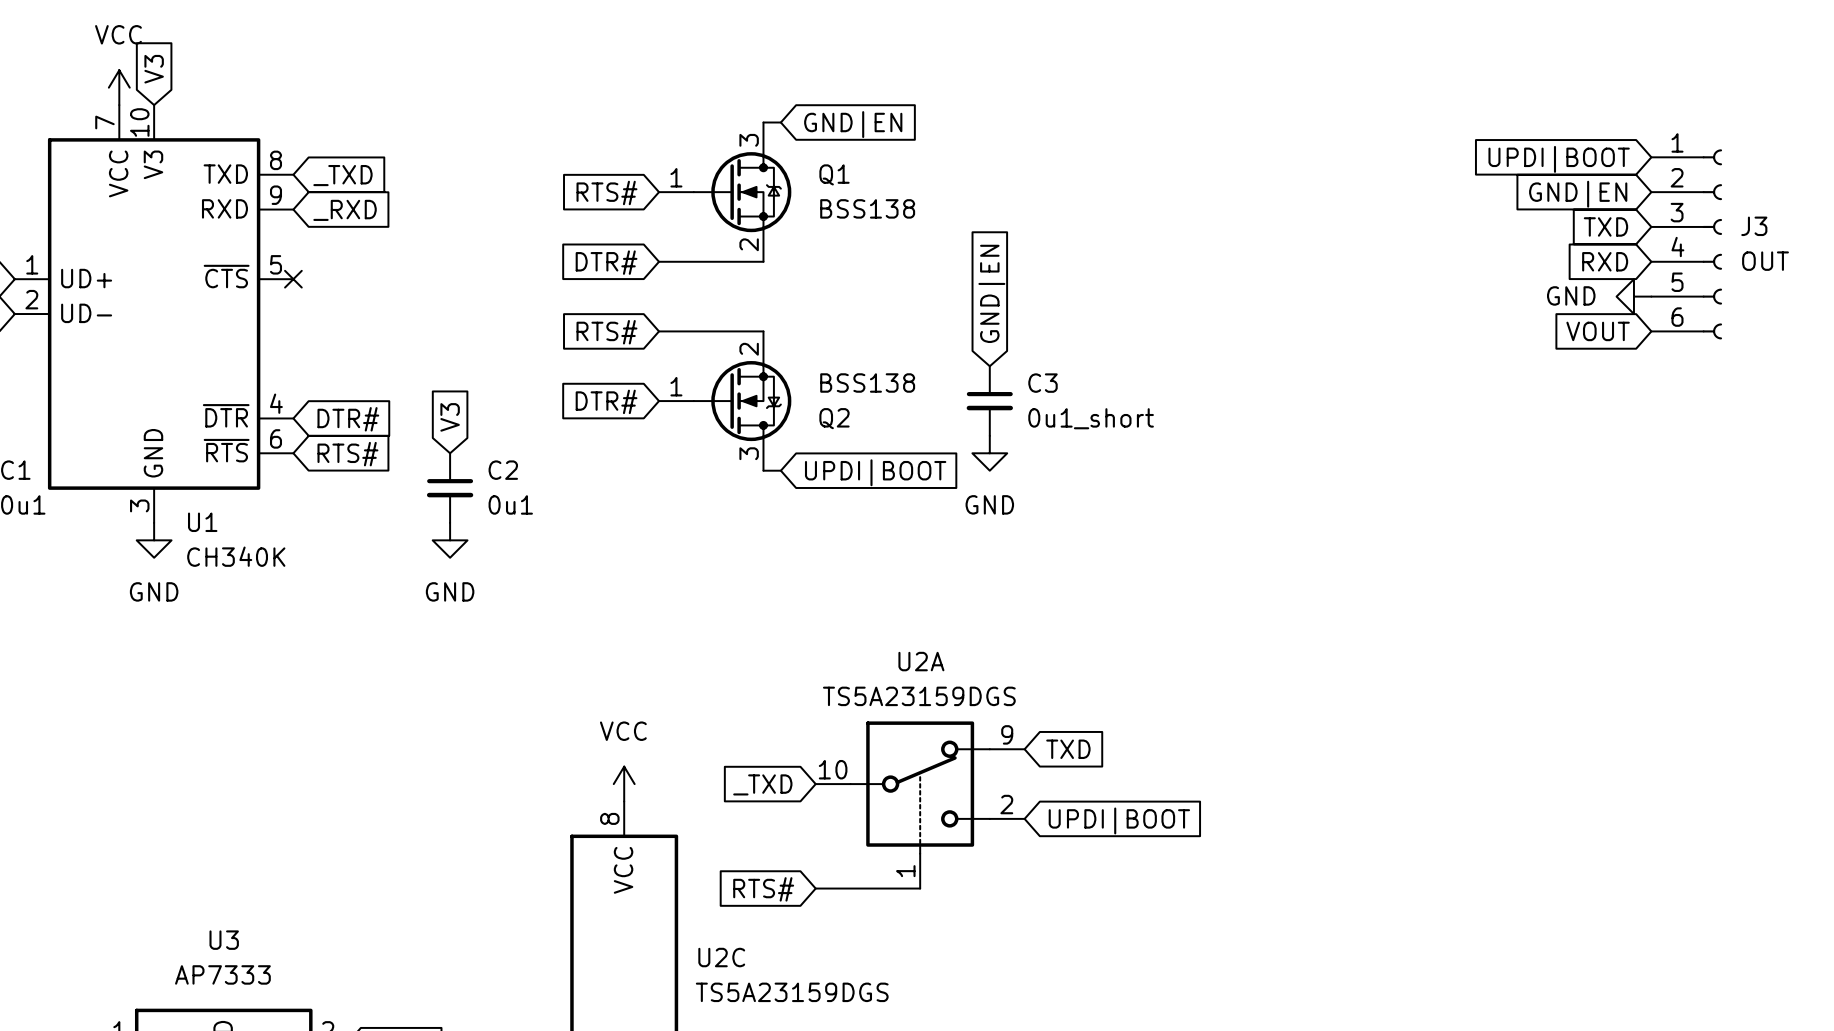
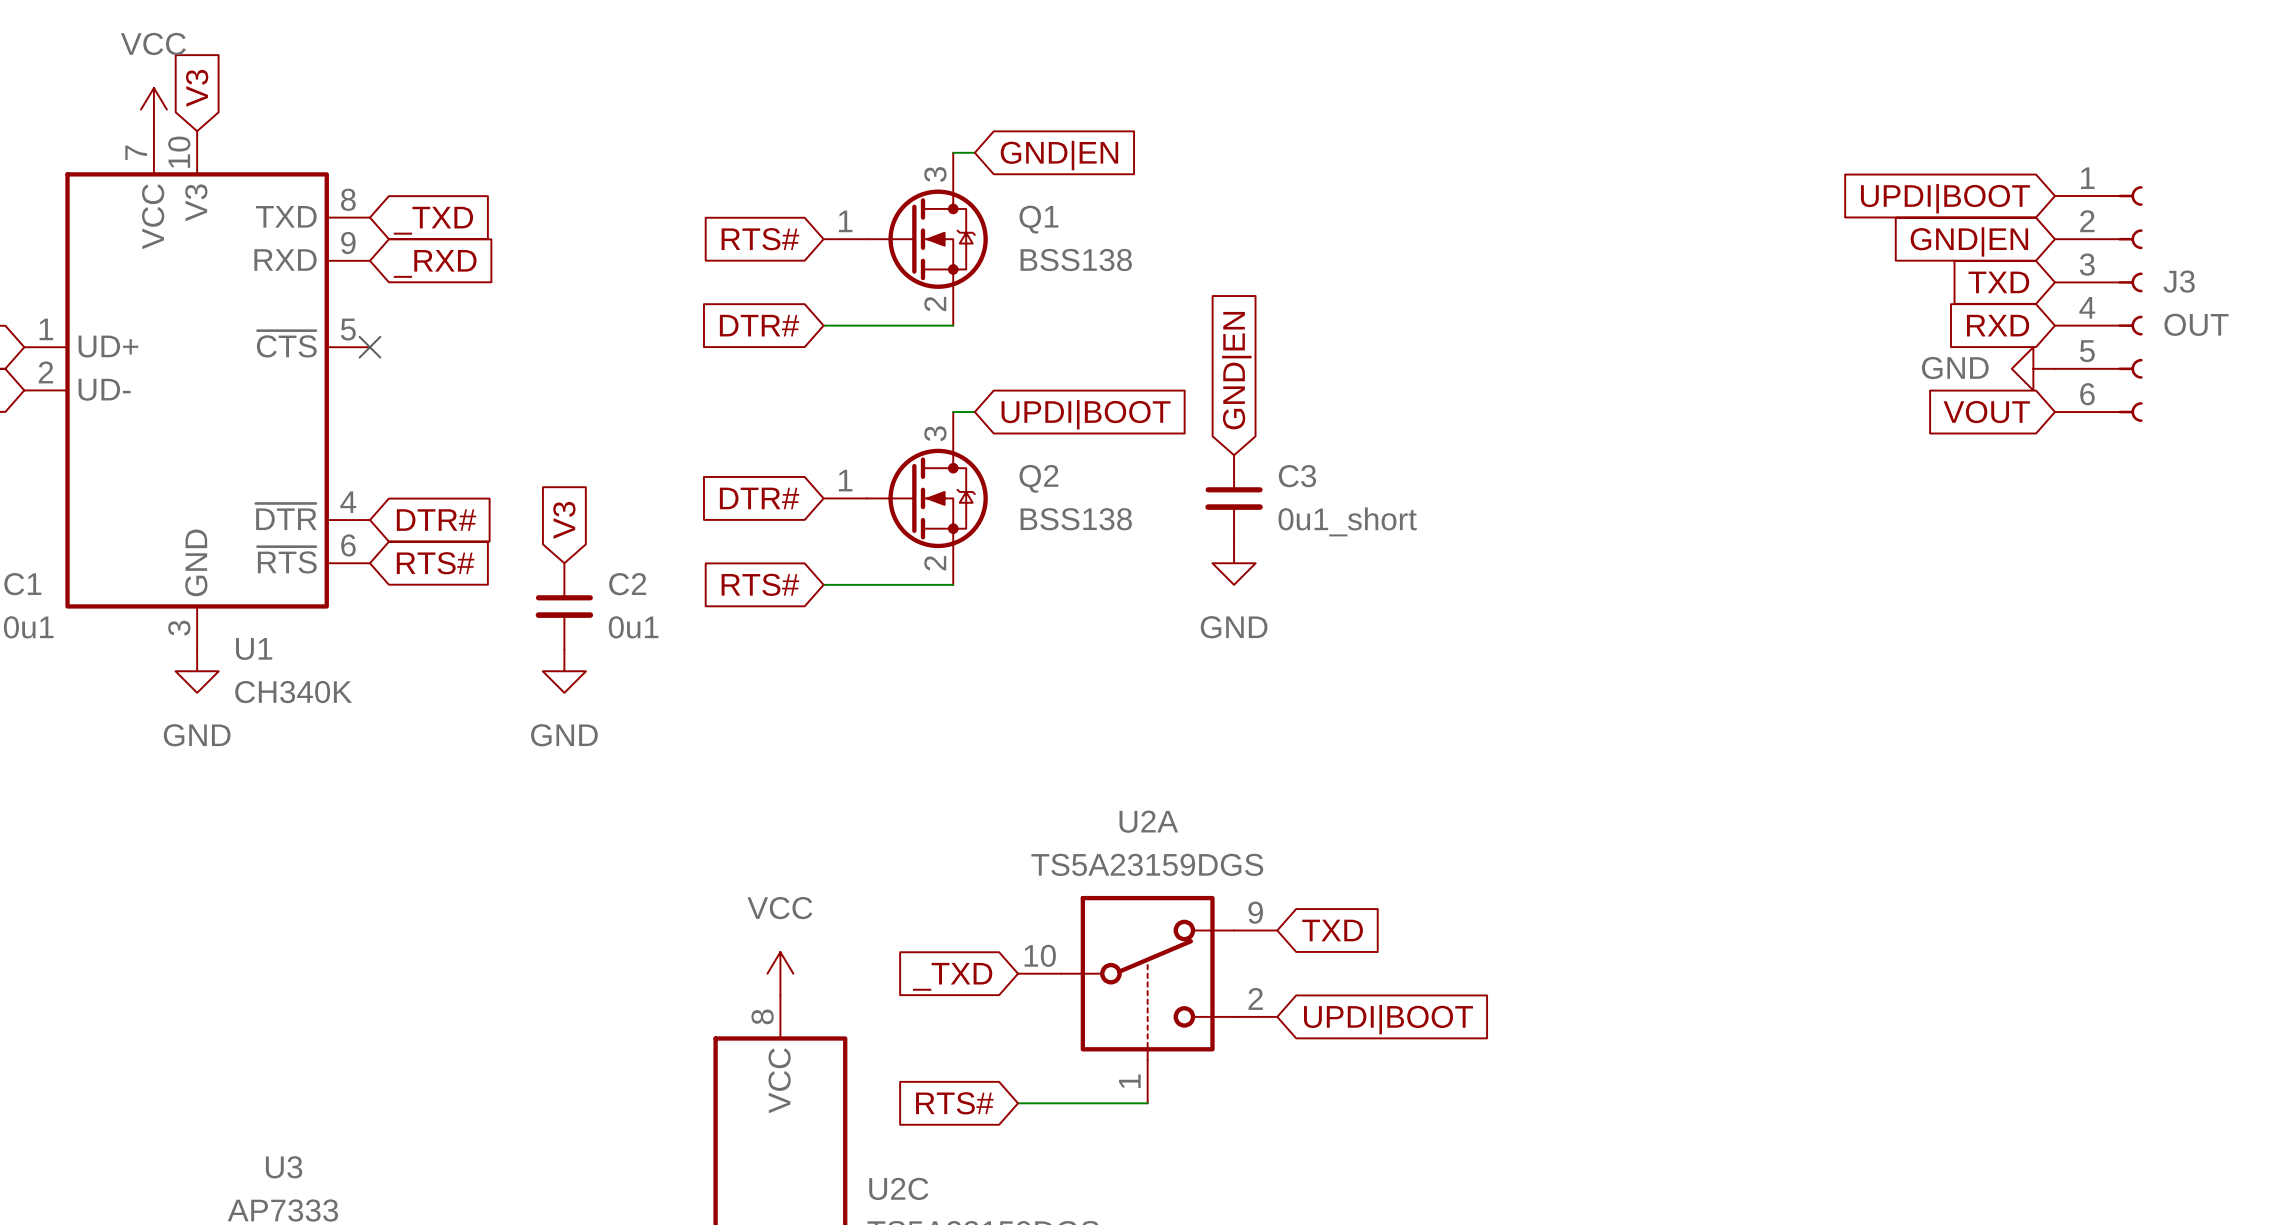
wire: (659, 331) (763, 331) -> (974, 412) (953, 412)
global label position: RTS# (606, 332) -> RTS# (760, 584)
Q2 flip: as is (742, 401) -> up-down (927, 498)
wire: (763, 470) (780, 470) -> (953, 584) (823, 584)
global label position: UPDI|BOOT (875, 472) -> UPDI|BOOT (1086, 414)

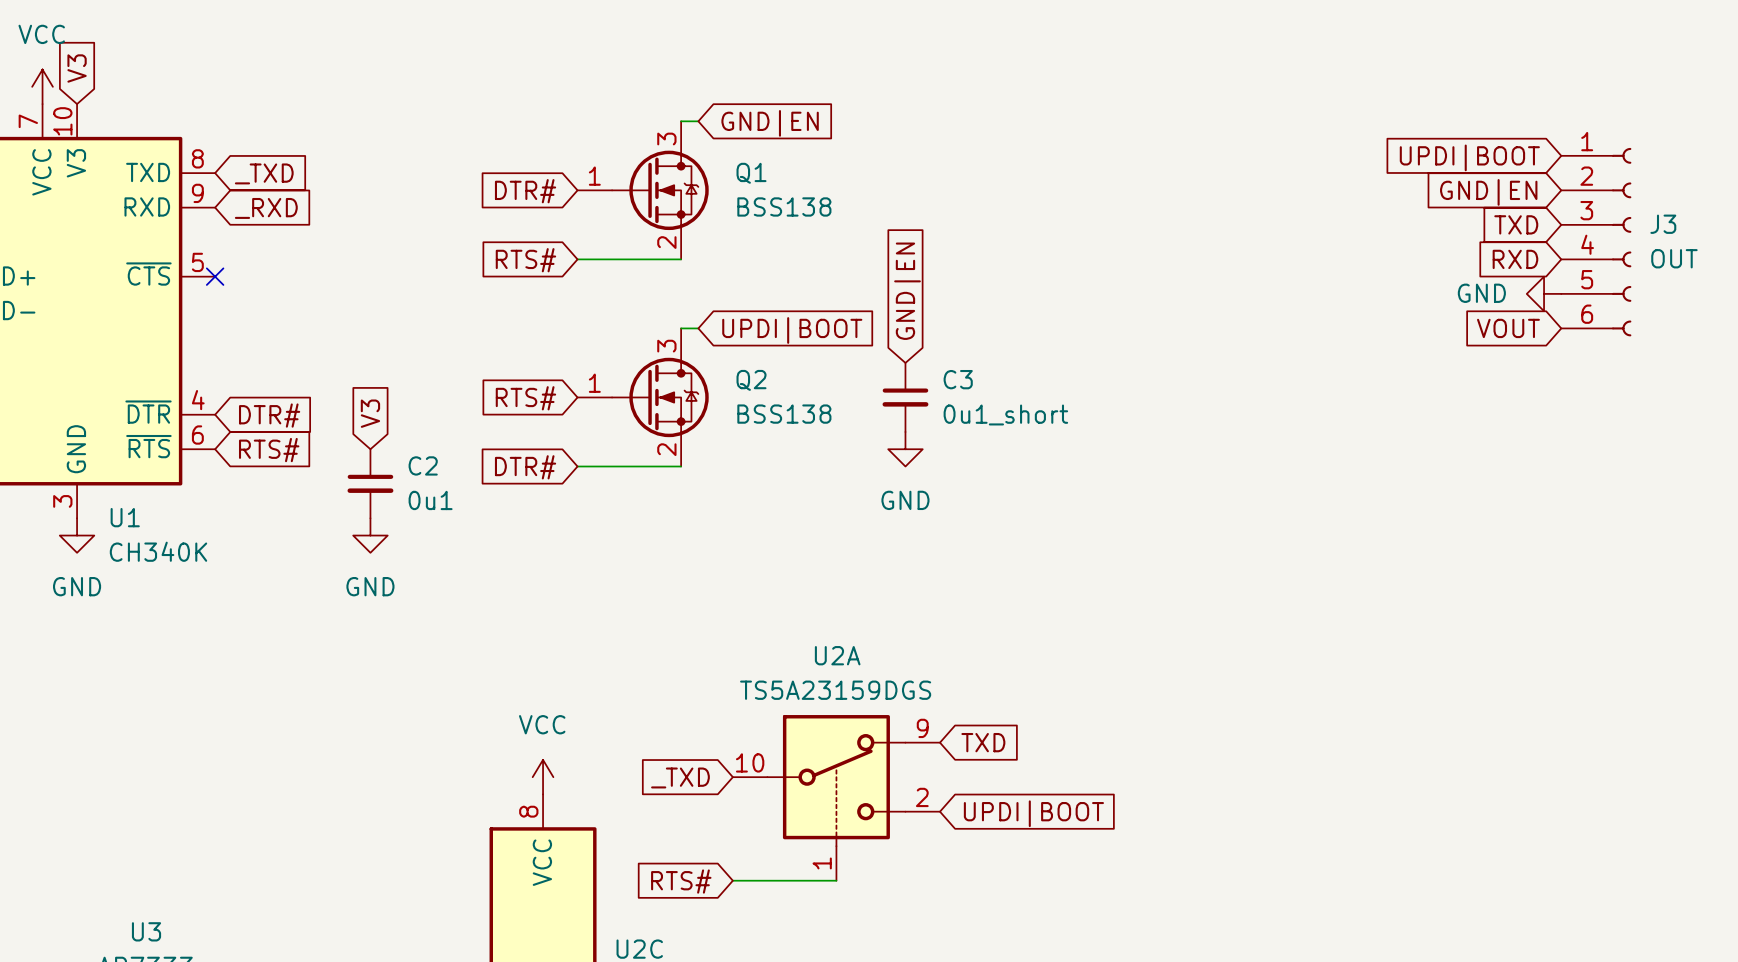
global label: RTS# (760, 239) -> DTR# (525, 191)
global label: DTR# (759, 325) -> RTS# (525, 260)
global label: DTR# (759, 498) -> RTS# (525, 398)
global label: RTS# (760, 584) -> DTR# (525, 467)

